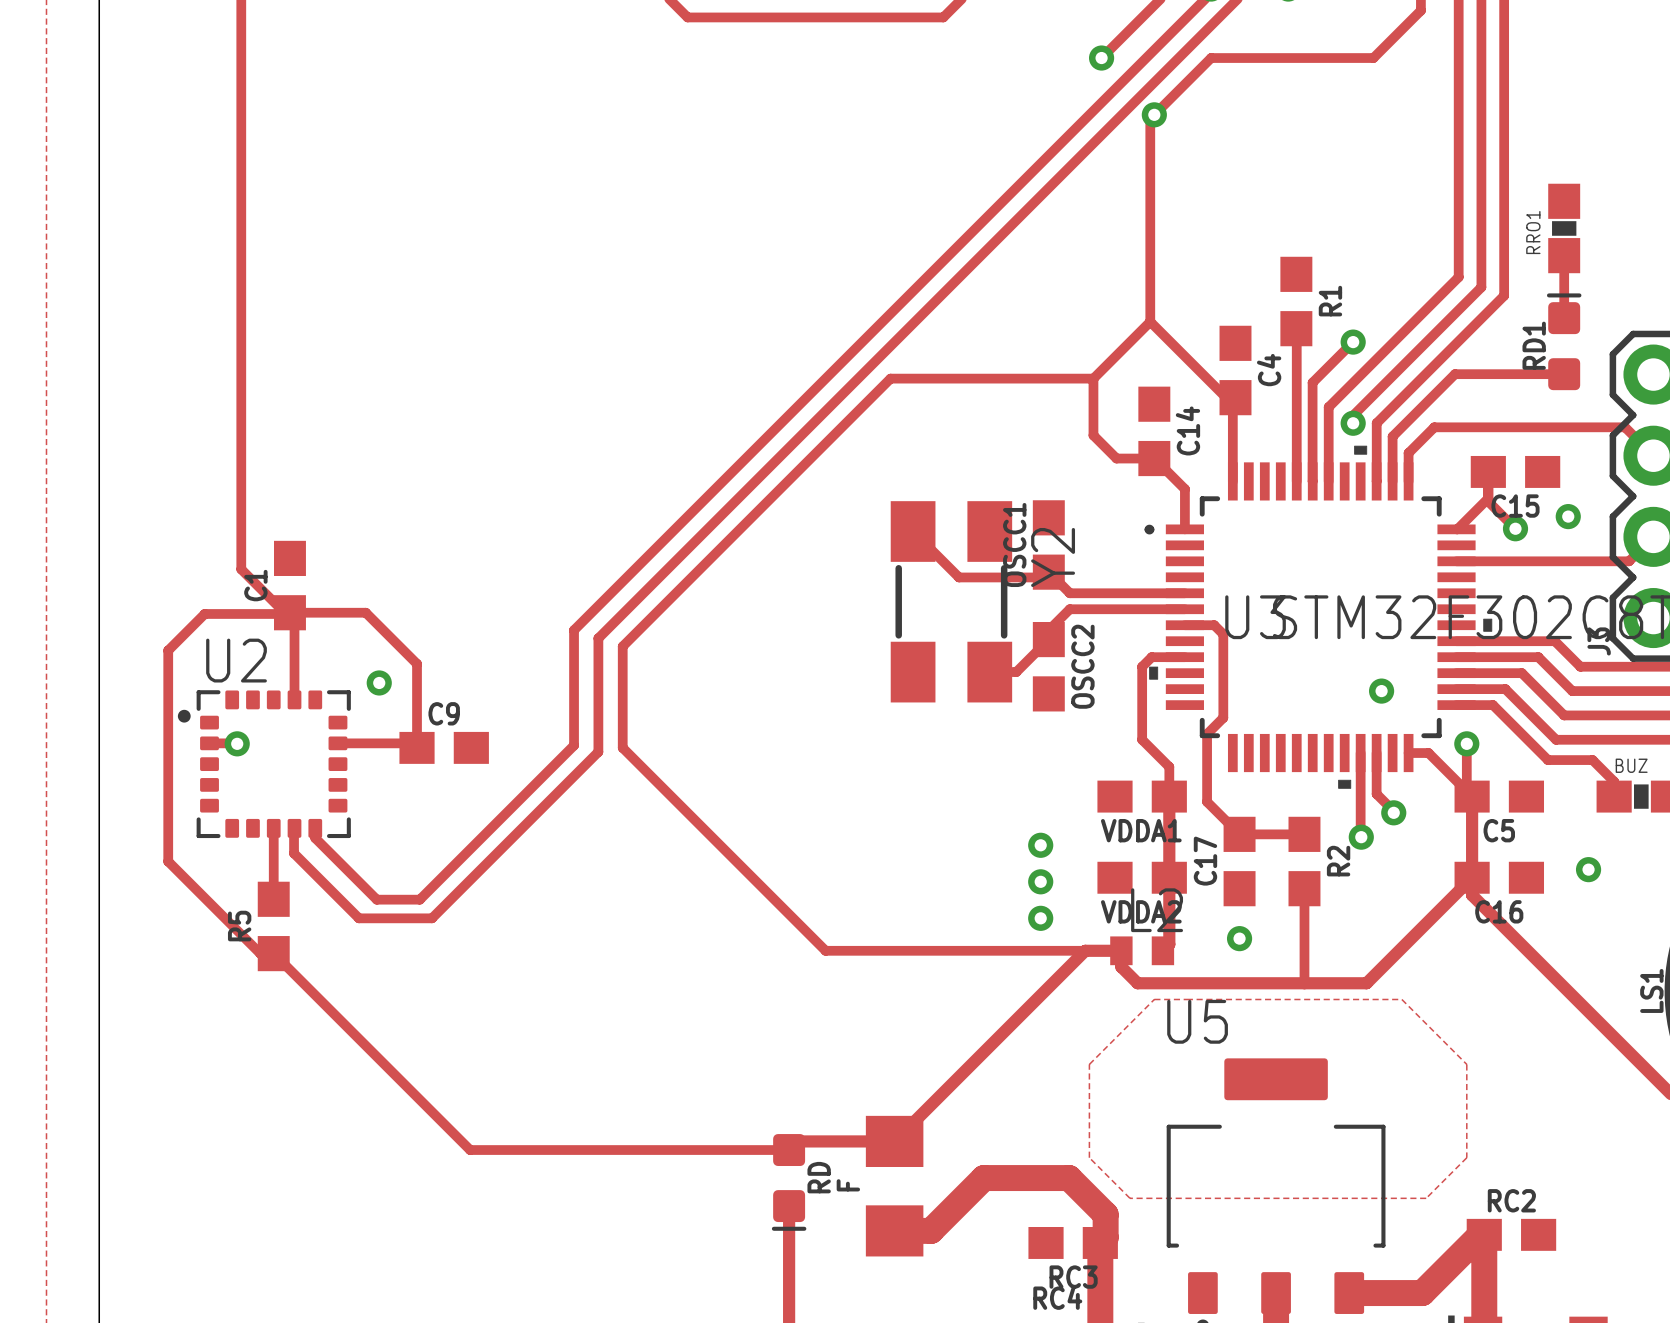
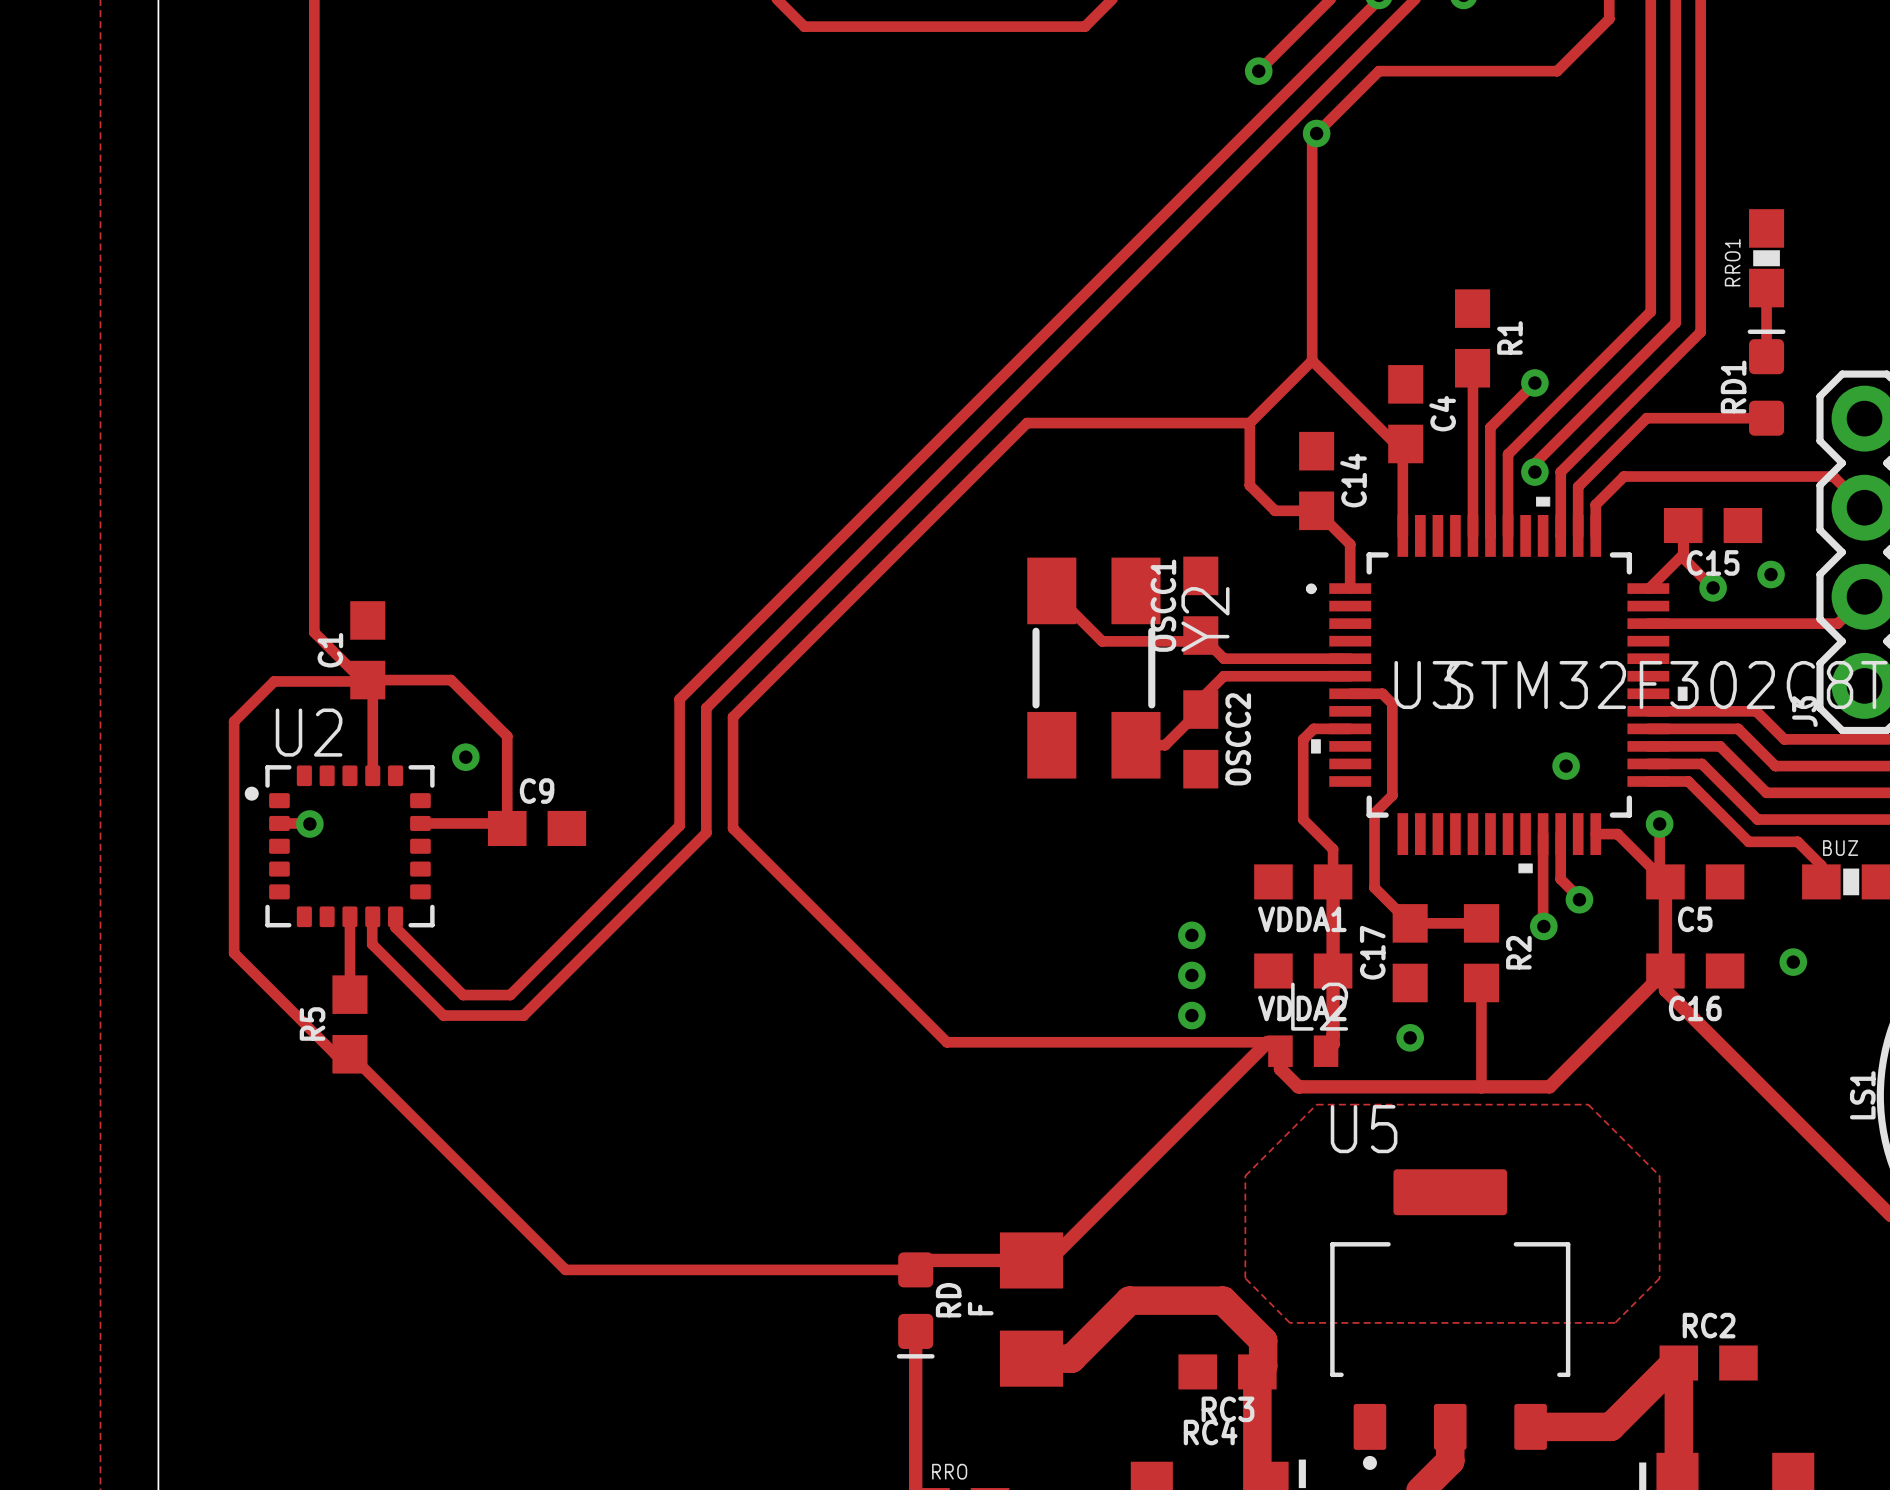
track: (817, 942) (825, 950) (1121, 950) (1085, 950) (894, 1141) -> (946, 1042) (1267, 1042) (1049, 1260) (1031, 1260)

